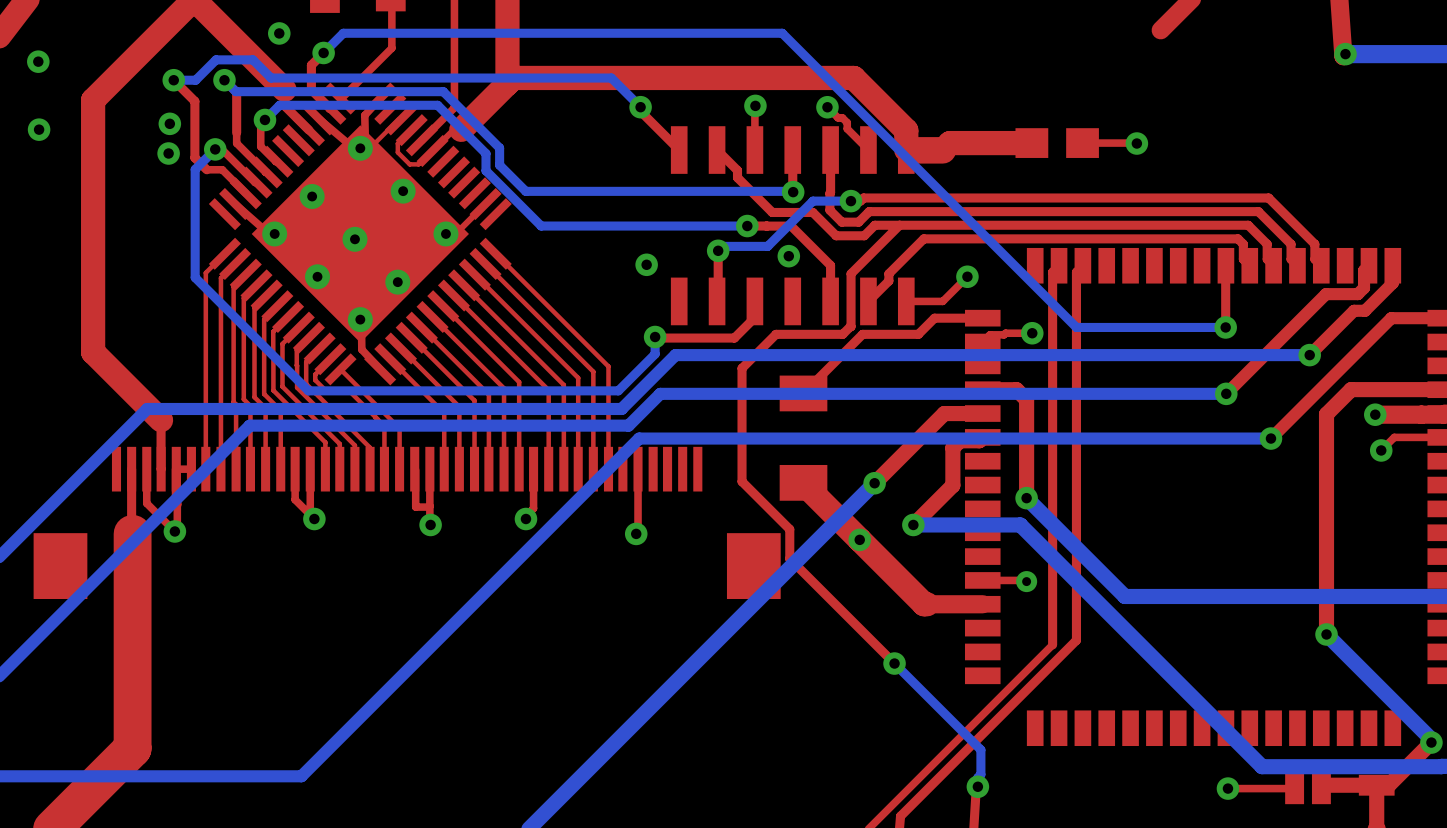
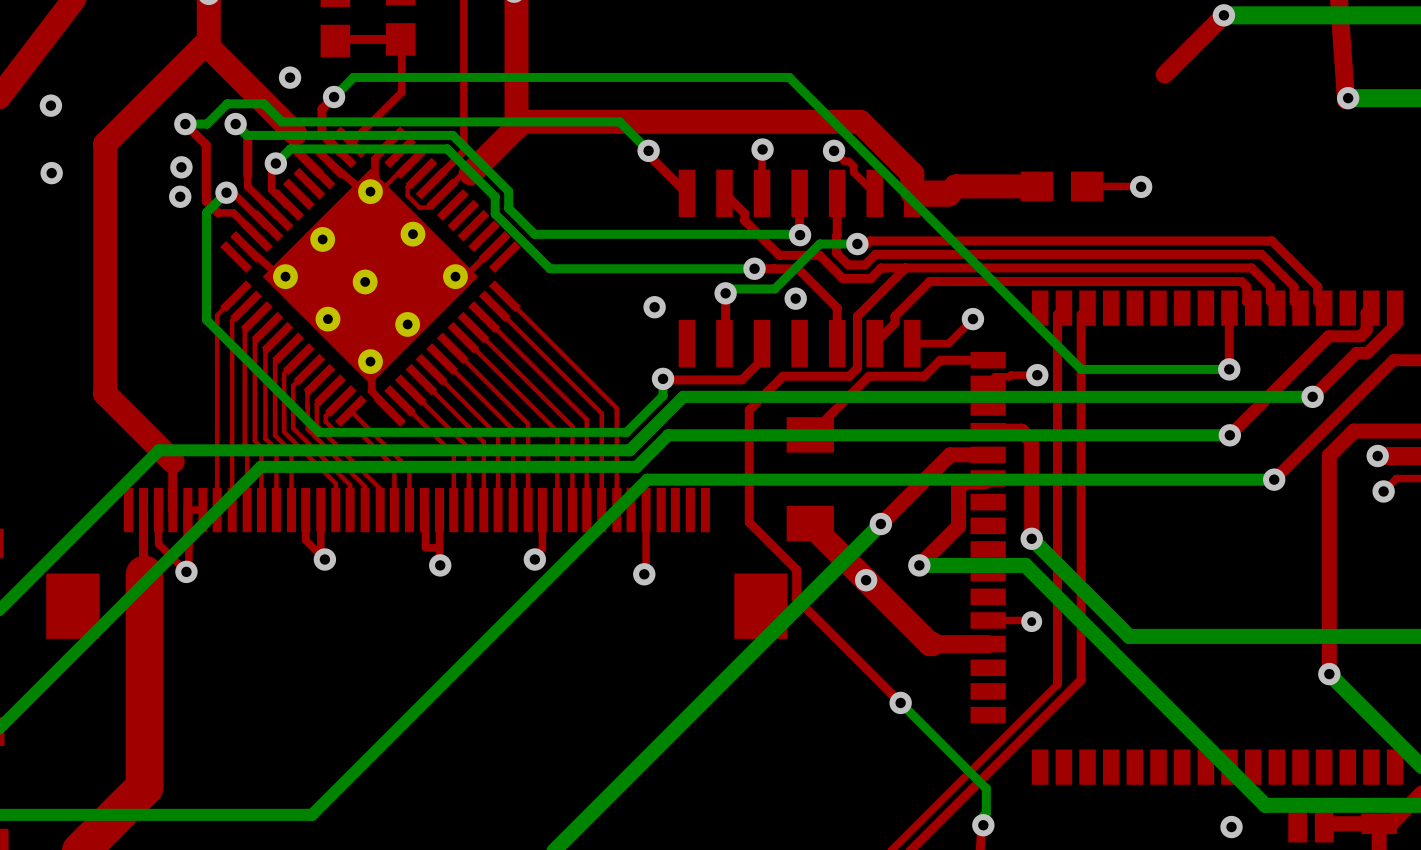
top track: (1294, 785) (1291, 788) (1227, 788) -> none

